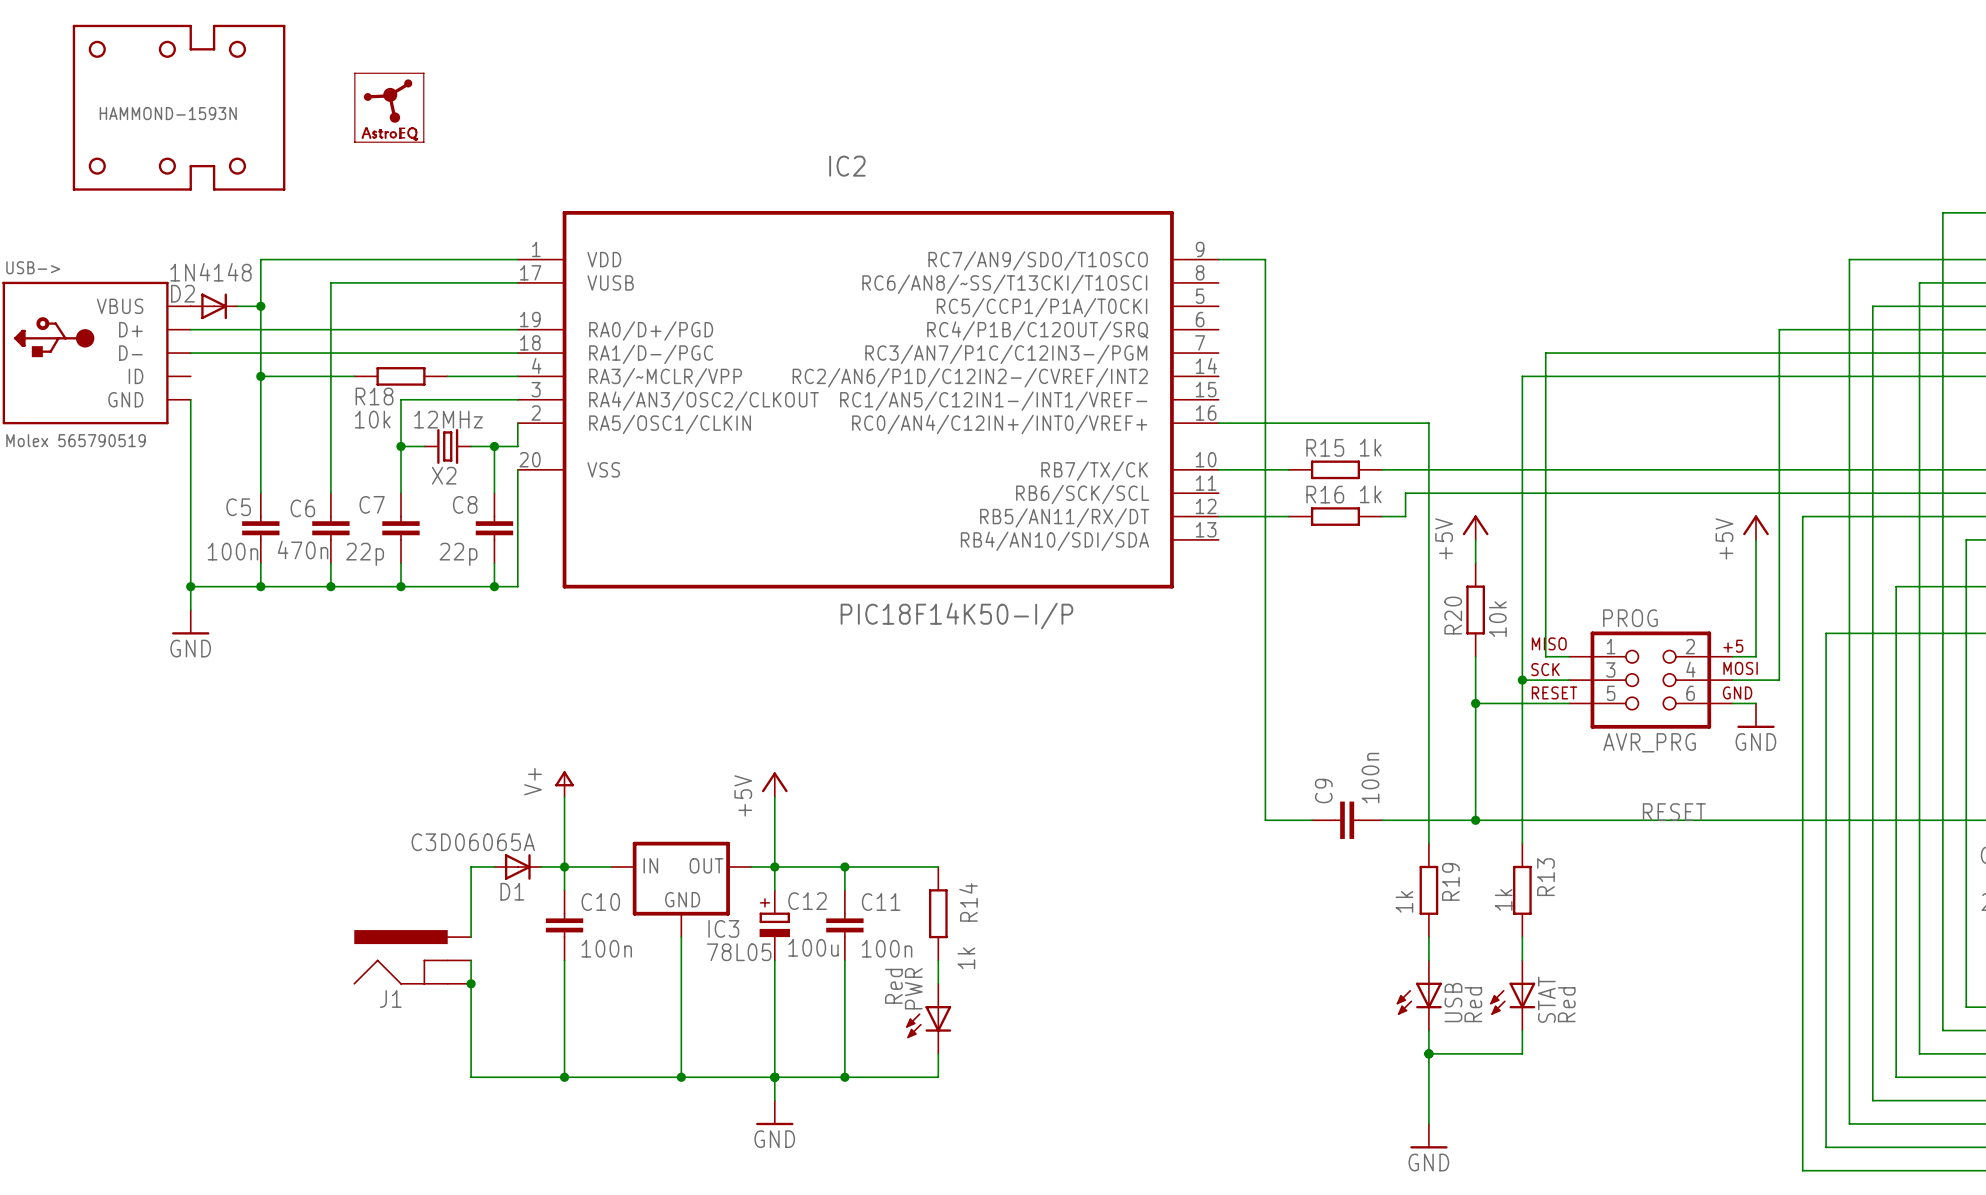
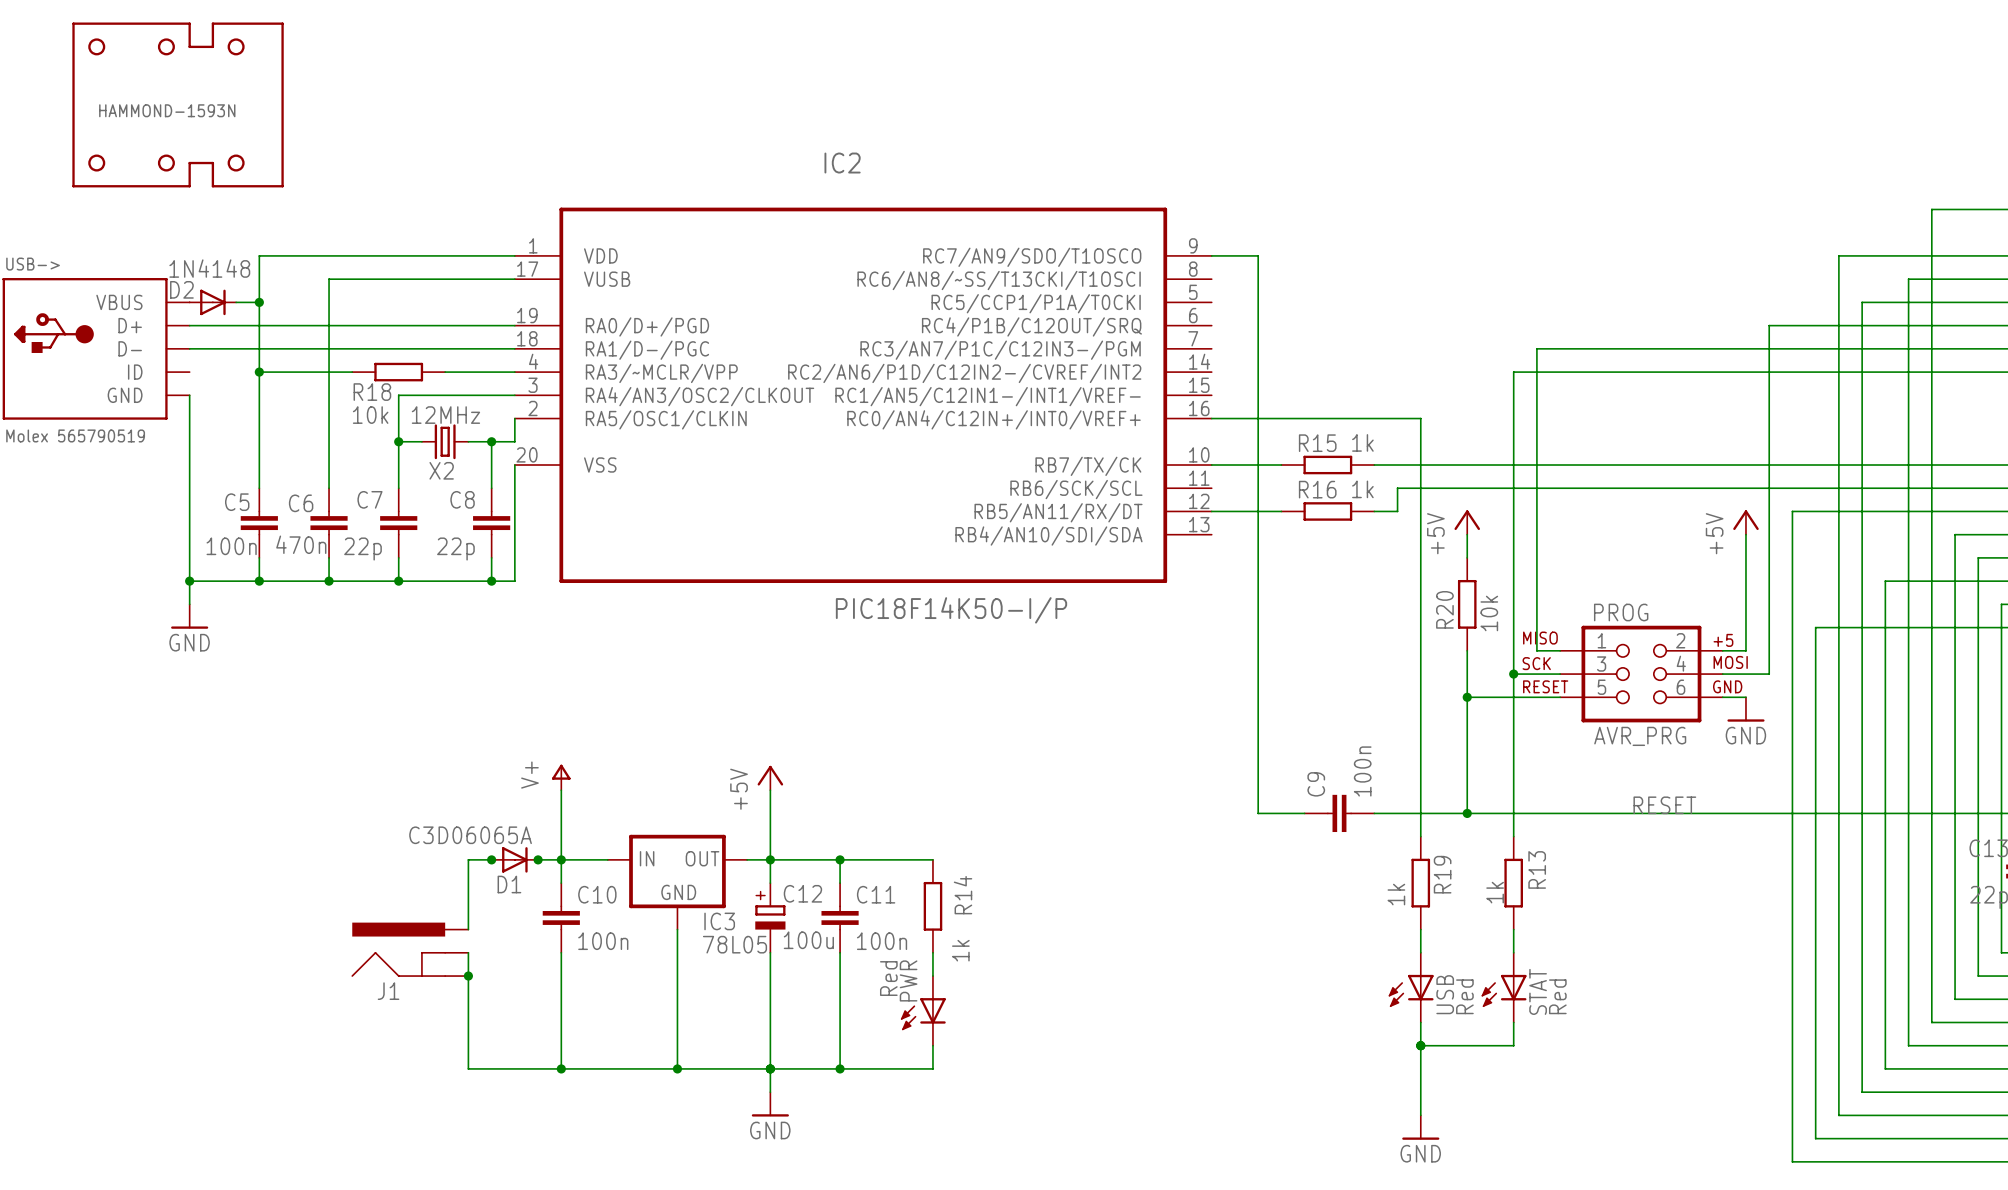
part: (389, 107) -> none
junction: none -> (491, 859)
junction: none -> (538, 859)

